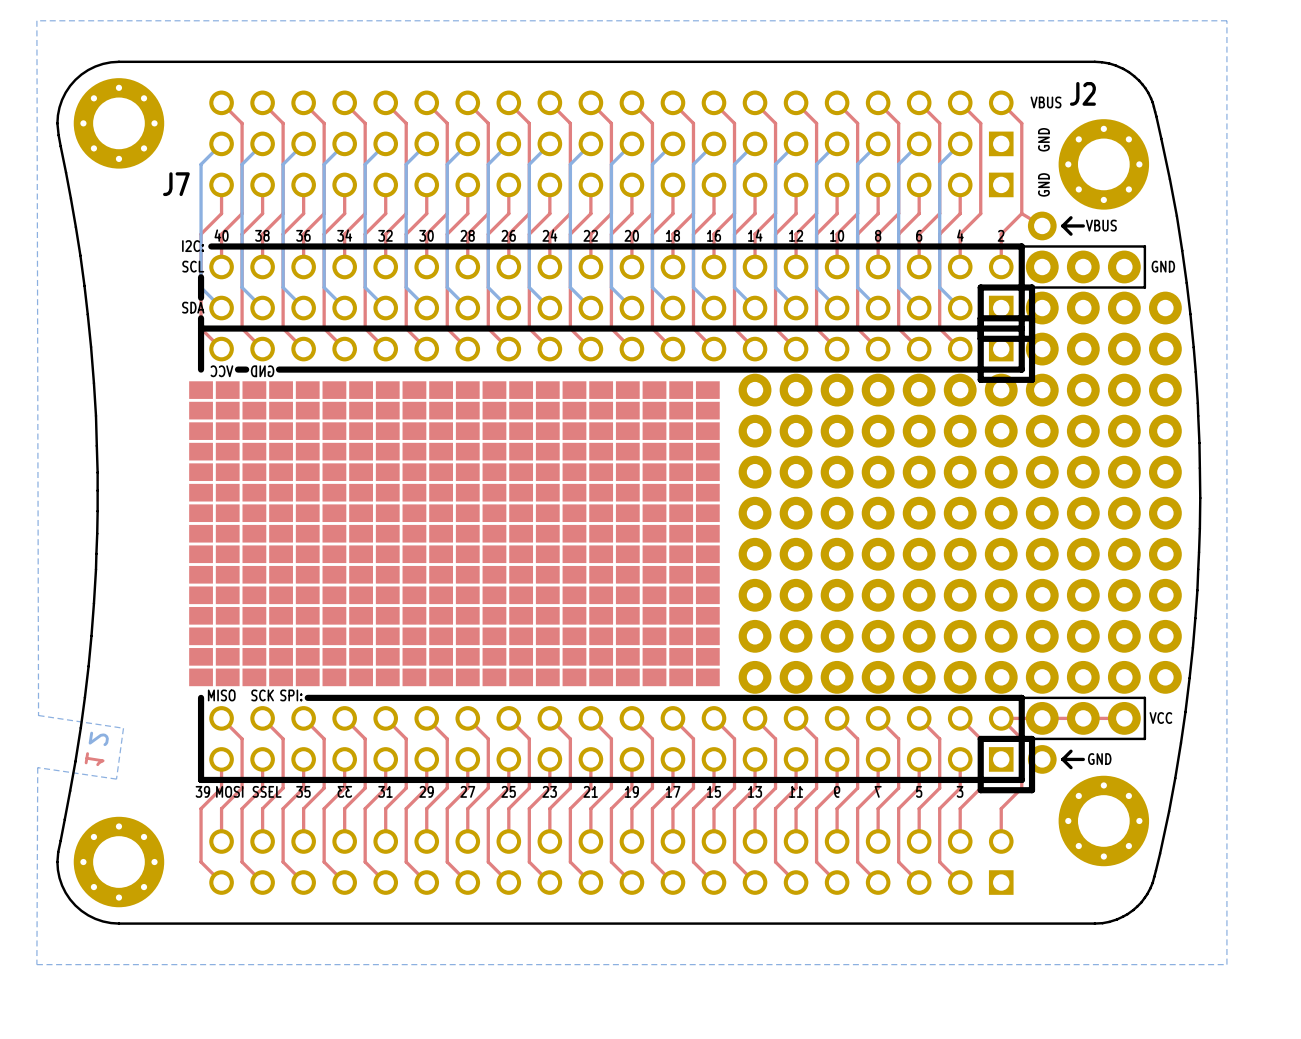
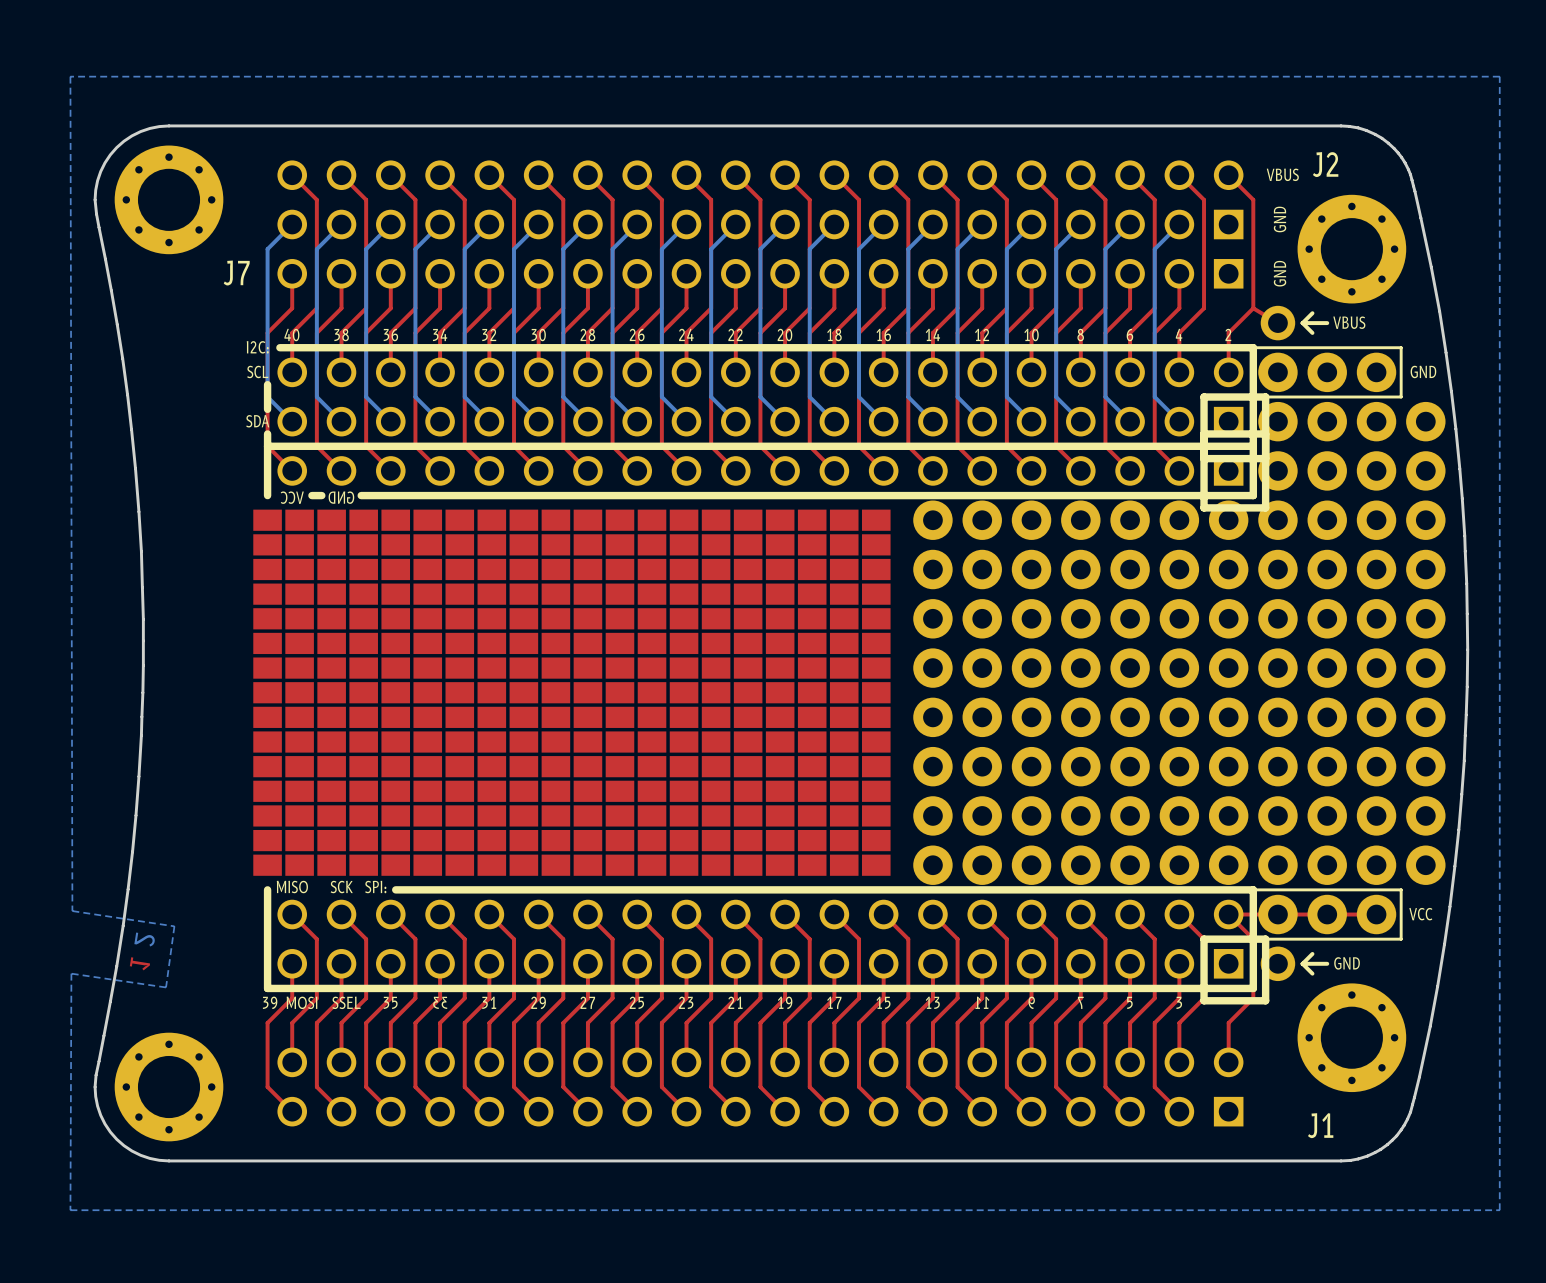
text: none -> J1 (1320, 1125)

